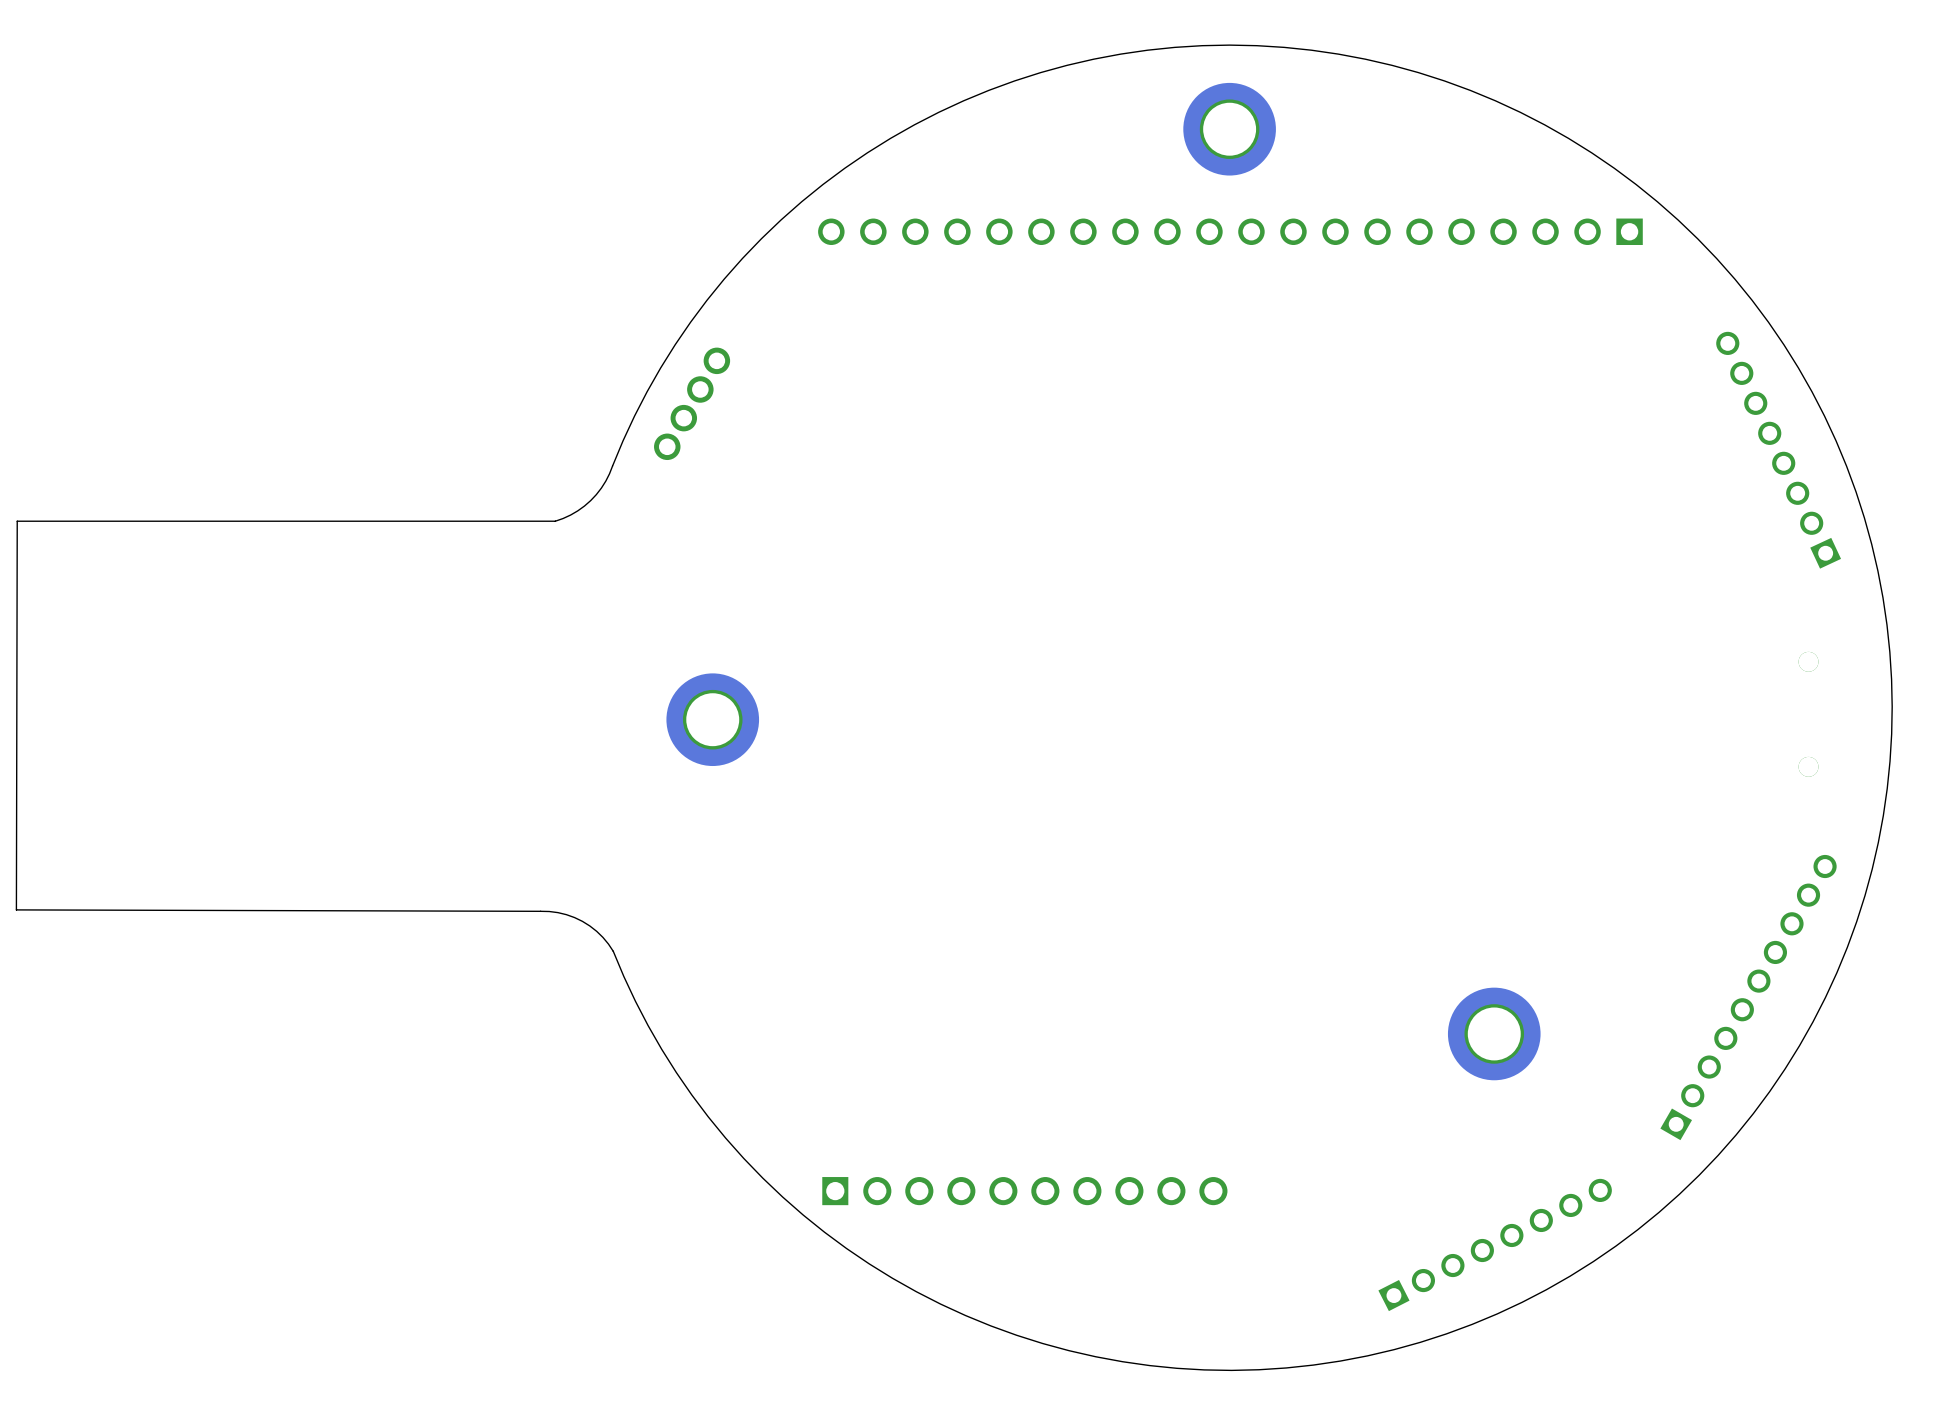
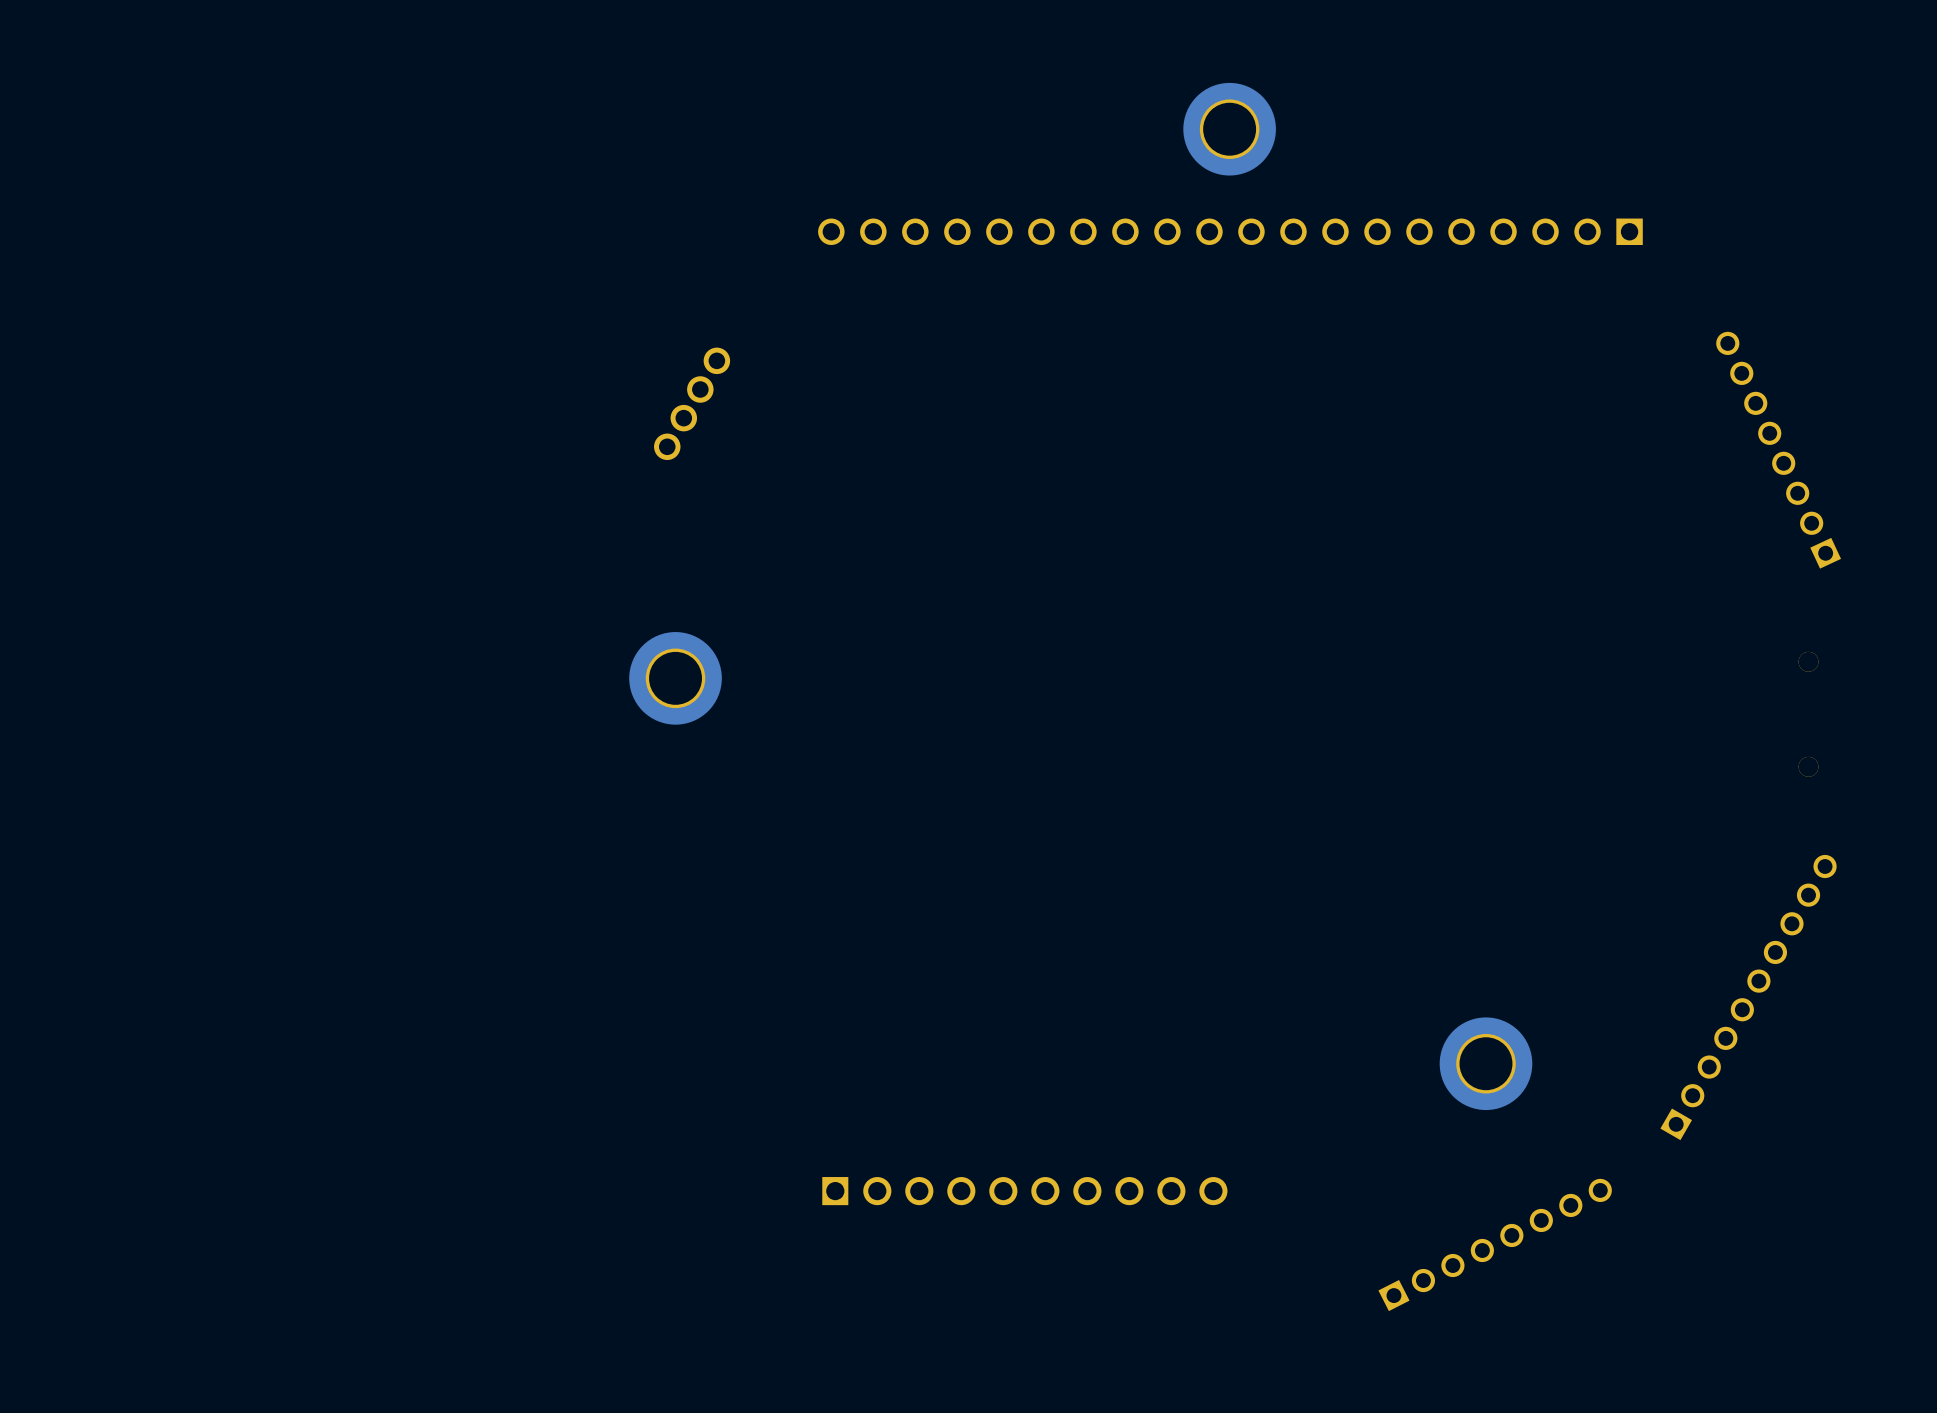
board edge: (612, 466) (634, 416) (660, 367) (690, 322) (742, 258) (801, 201) (844, 168) (914, 124) (963, 100) (1040, 72) (1093, 59) (1147, 50) (1202, 45) (1256, 45) (1338, 54) (1418, 72) (1470, 90) (1520, 112) (1591, 152) (1657, 201) (1697, 238) (1752, 300) (1783, 344) (1811, 391) (1836, 440) (1856, 491) (1871, 544) (1883, 597) (1891, 679) (1891, 734) (1883, 815) (1872, 869) (1847, 947) (1825, 997) (1799, 1045) (1769, 1091) (1736, 1134) (1679, 1194) (1637, 1229) (1593, 1261) (1546, 1289) (1497, 1313) (1446, 1333) (1394, 1349) (1340, 1361) (1286, 1367) (1204, 1369) (1149, 1365) (1095, 1356) (1016, 1335) (965, 1315) (916, 1291) (846, 1248) (782, 1197) (725, 1138) (691, 1095) (661, 1049) (635, 1001) (608, 944) (596, 931) (574, 917) (557, 912) (540, 911) (16, 909) (17, 521) (555, 521) (570, 515) (590, 500) (605, 481) (612, 466) -> none
part position: (712, 719) -> (675, 678)
part position: (1494, 1033) -> (1485, 1063)

